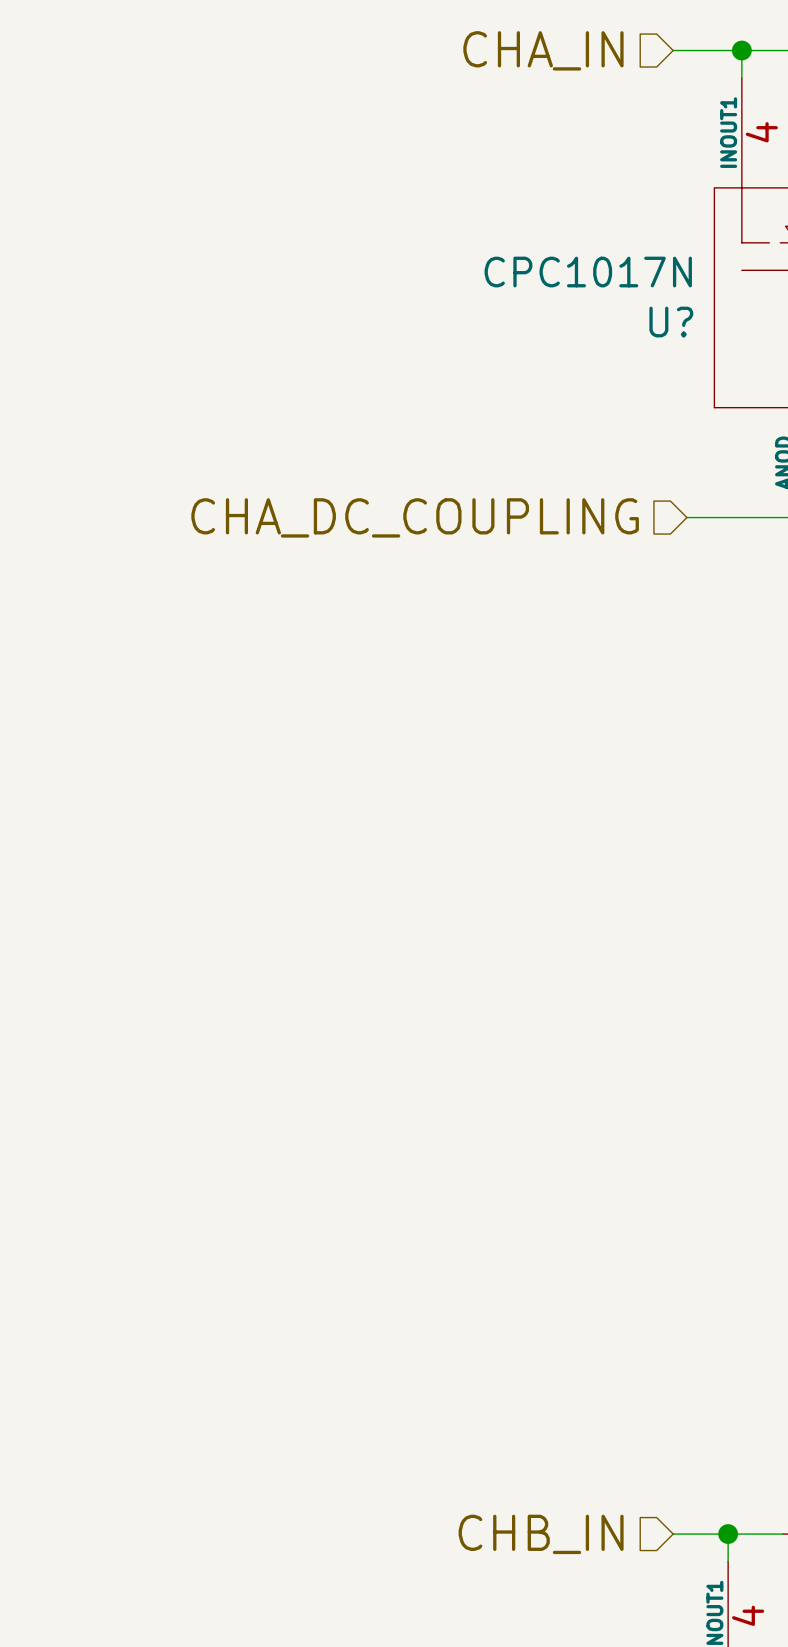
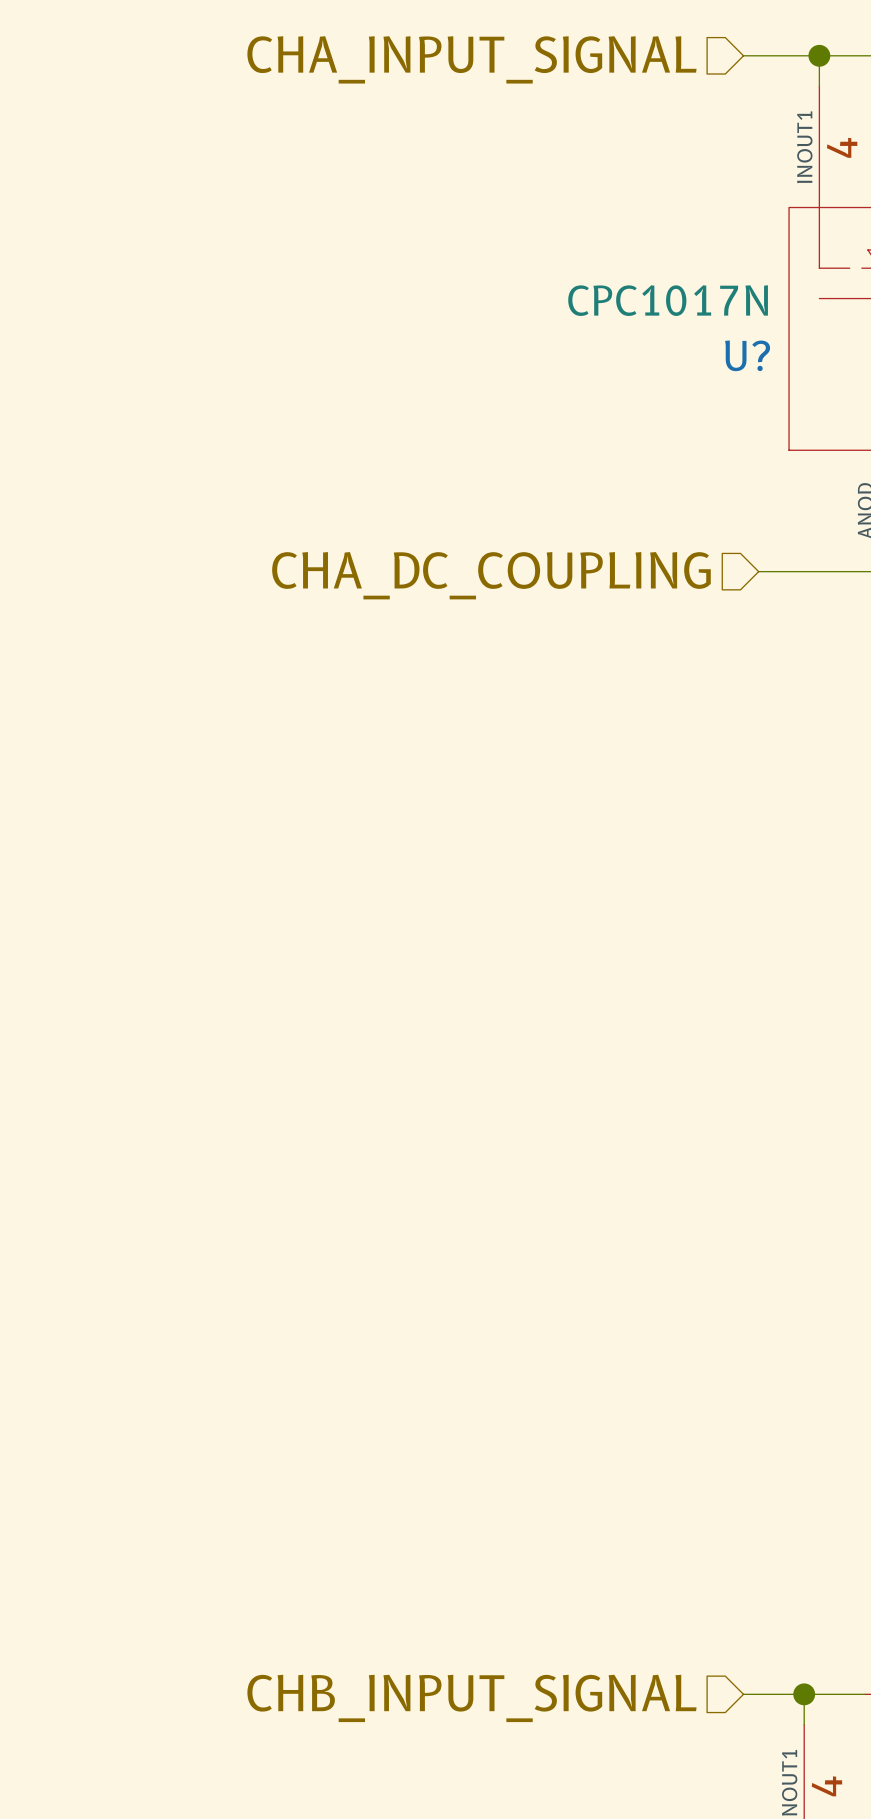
hierarchical label: CHA_IN (543, 50) -> CHA_INPUT_SIGNAL (471, 59)
hierarchical label: CHB_IN (541, 1534) -> CHB_INPUT_SIGNAL (471, 1698)

